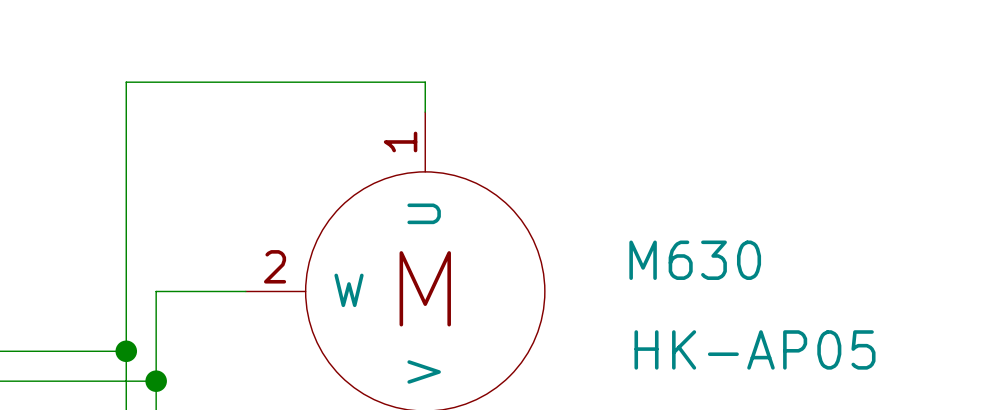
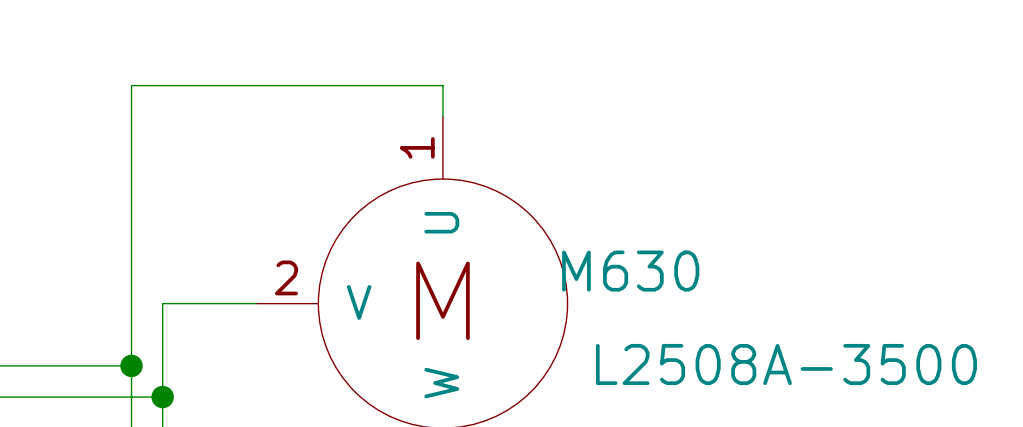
M630 name position: M630 (695, 260) -> M630 (630, 271)
M630 pin name: W (349, 290) -> V (359, 302)
M630 value: HK-AP05 (755, 349) -> L2508A-3500 (786, 364)
M630 pin name: V (424, 371) -> W (441, 383)

